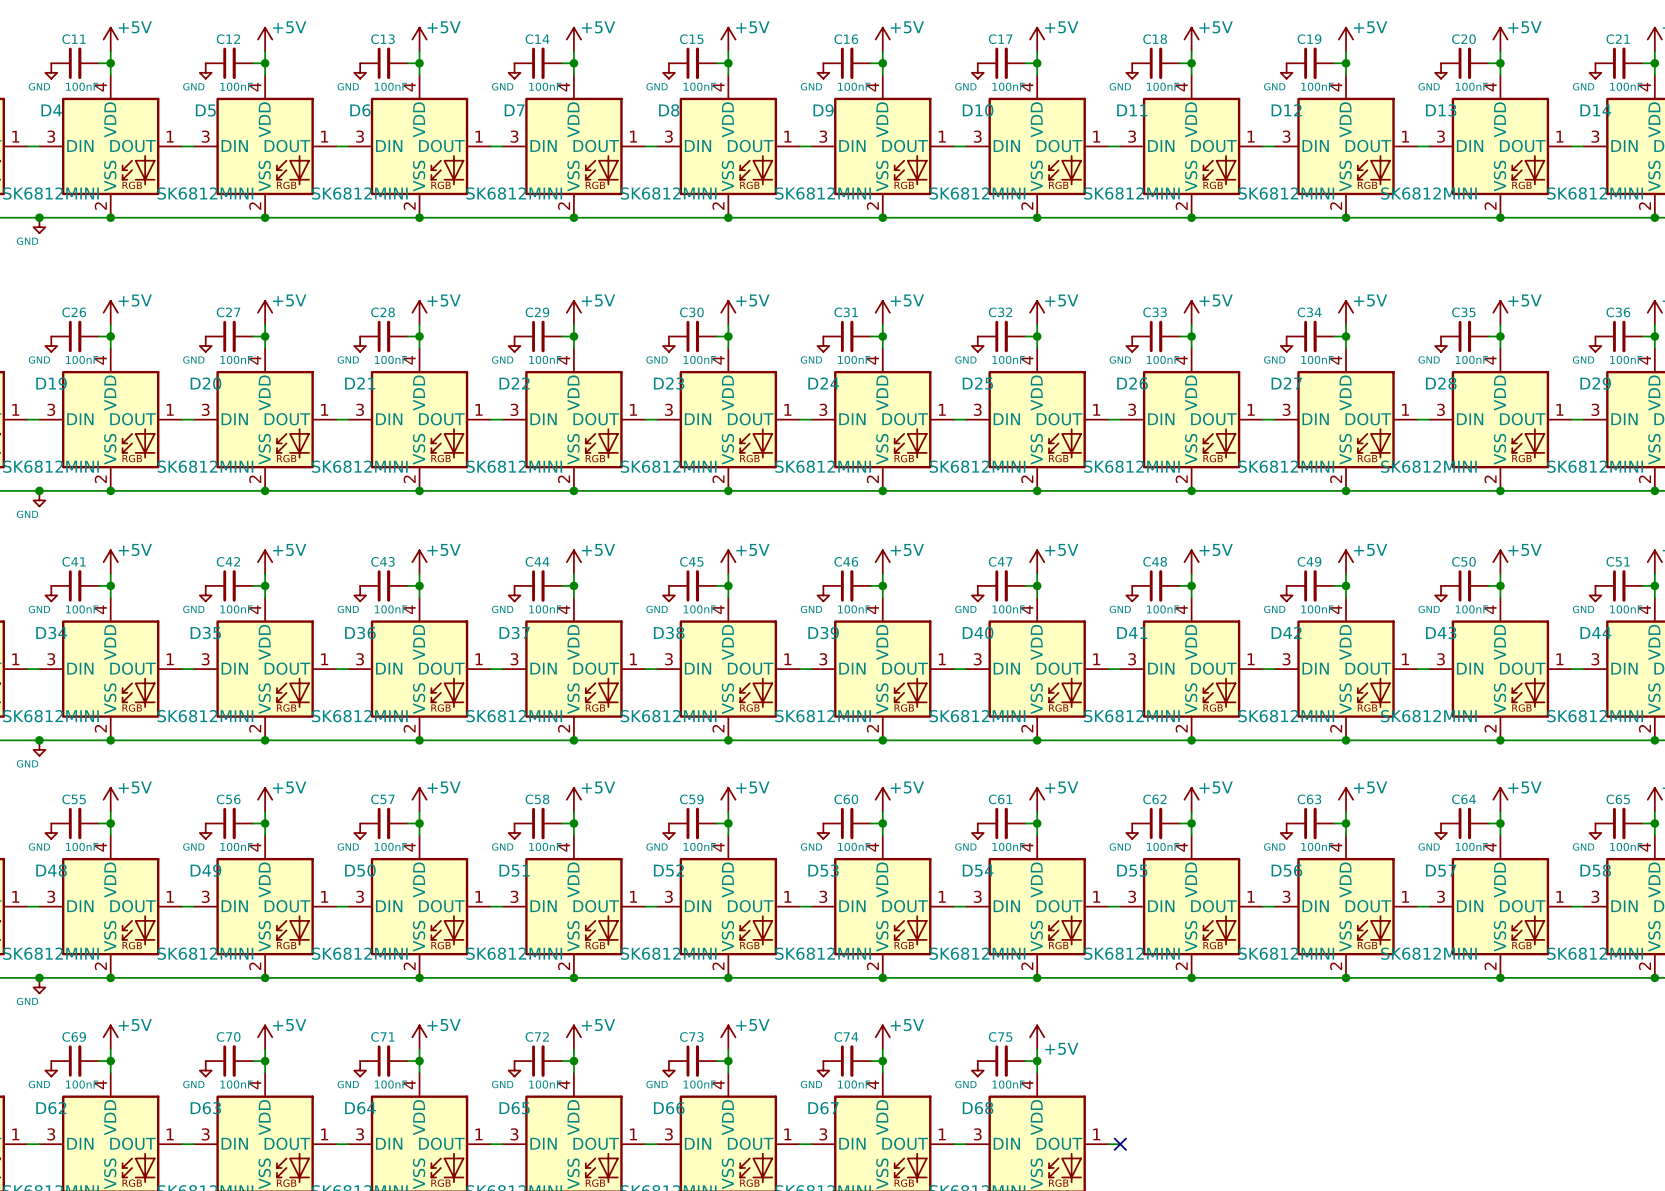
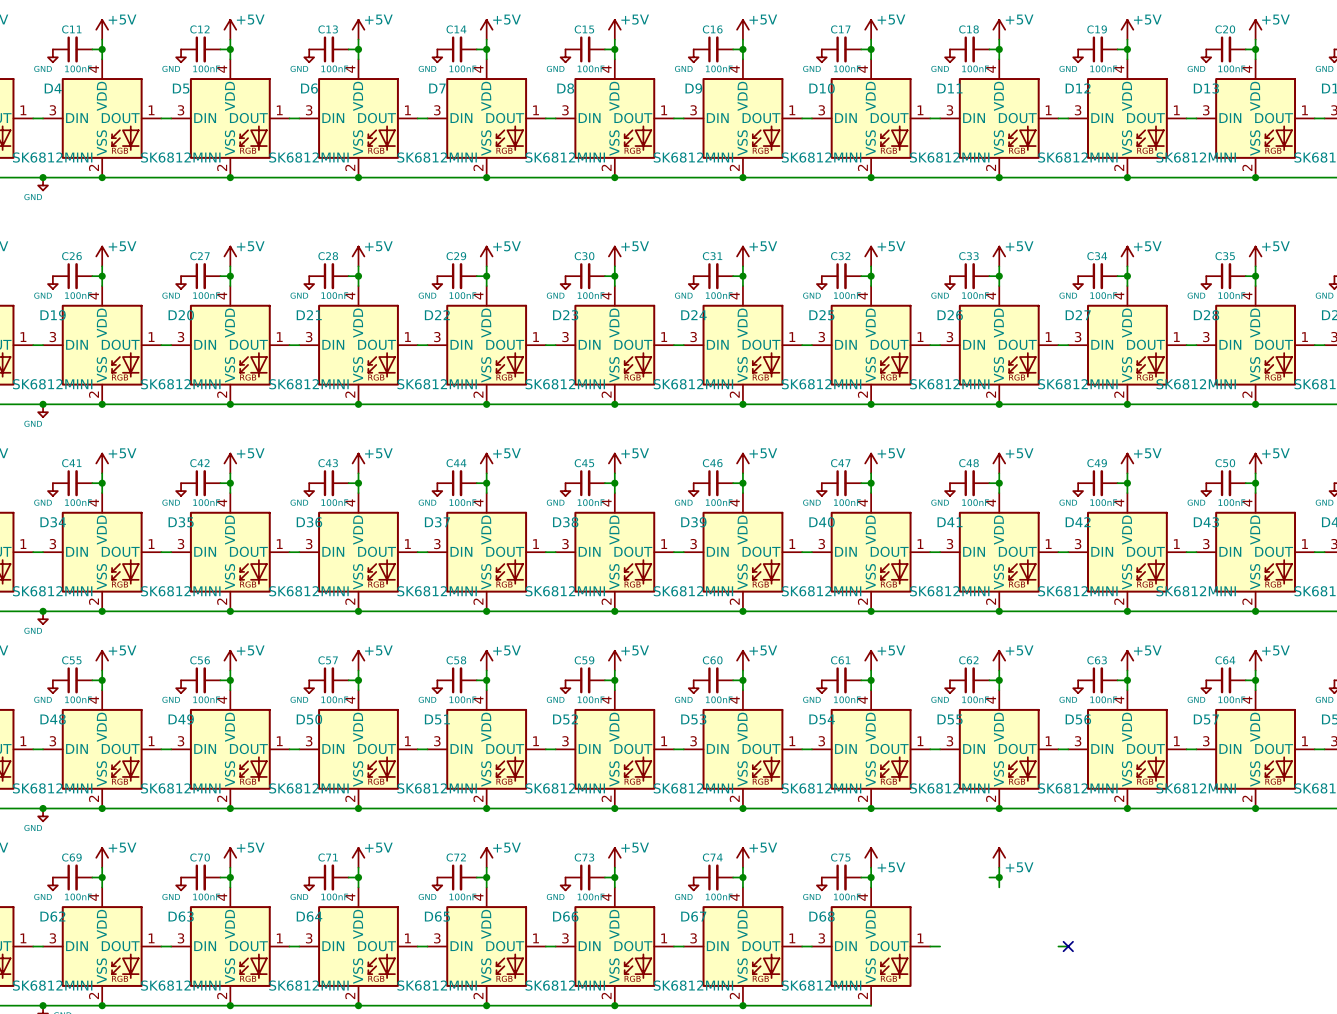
power symbol: none -> +5V (999, 857)
wire: none -> (999, 867) (999, 887)
wire: none -> (989, 877) (999, 877)
junction: none -> (999, 877)
no-connect mark: (1120, 1144) -> none
wire: none -> (1058, 946) (1068, 946)
no-connect mark: none -> (1068, 946)

